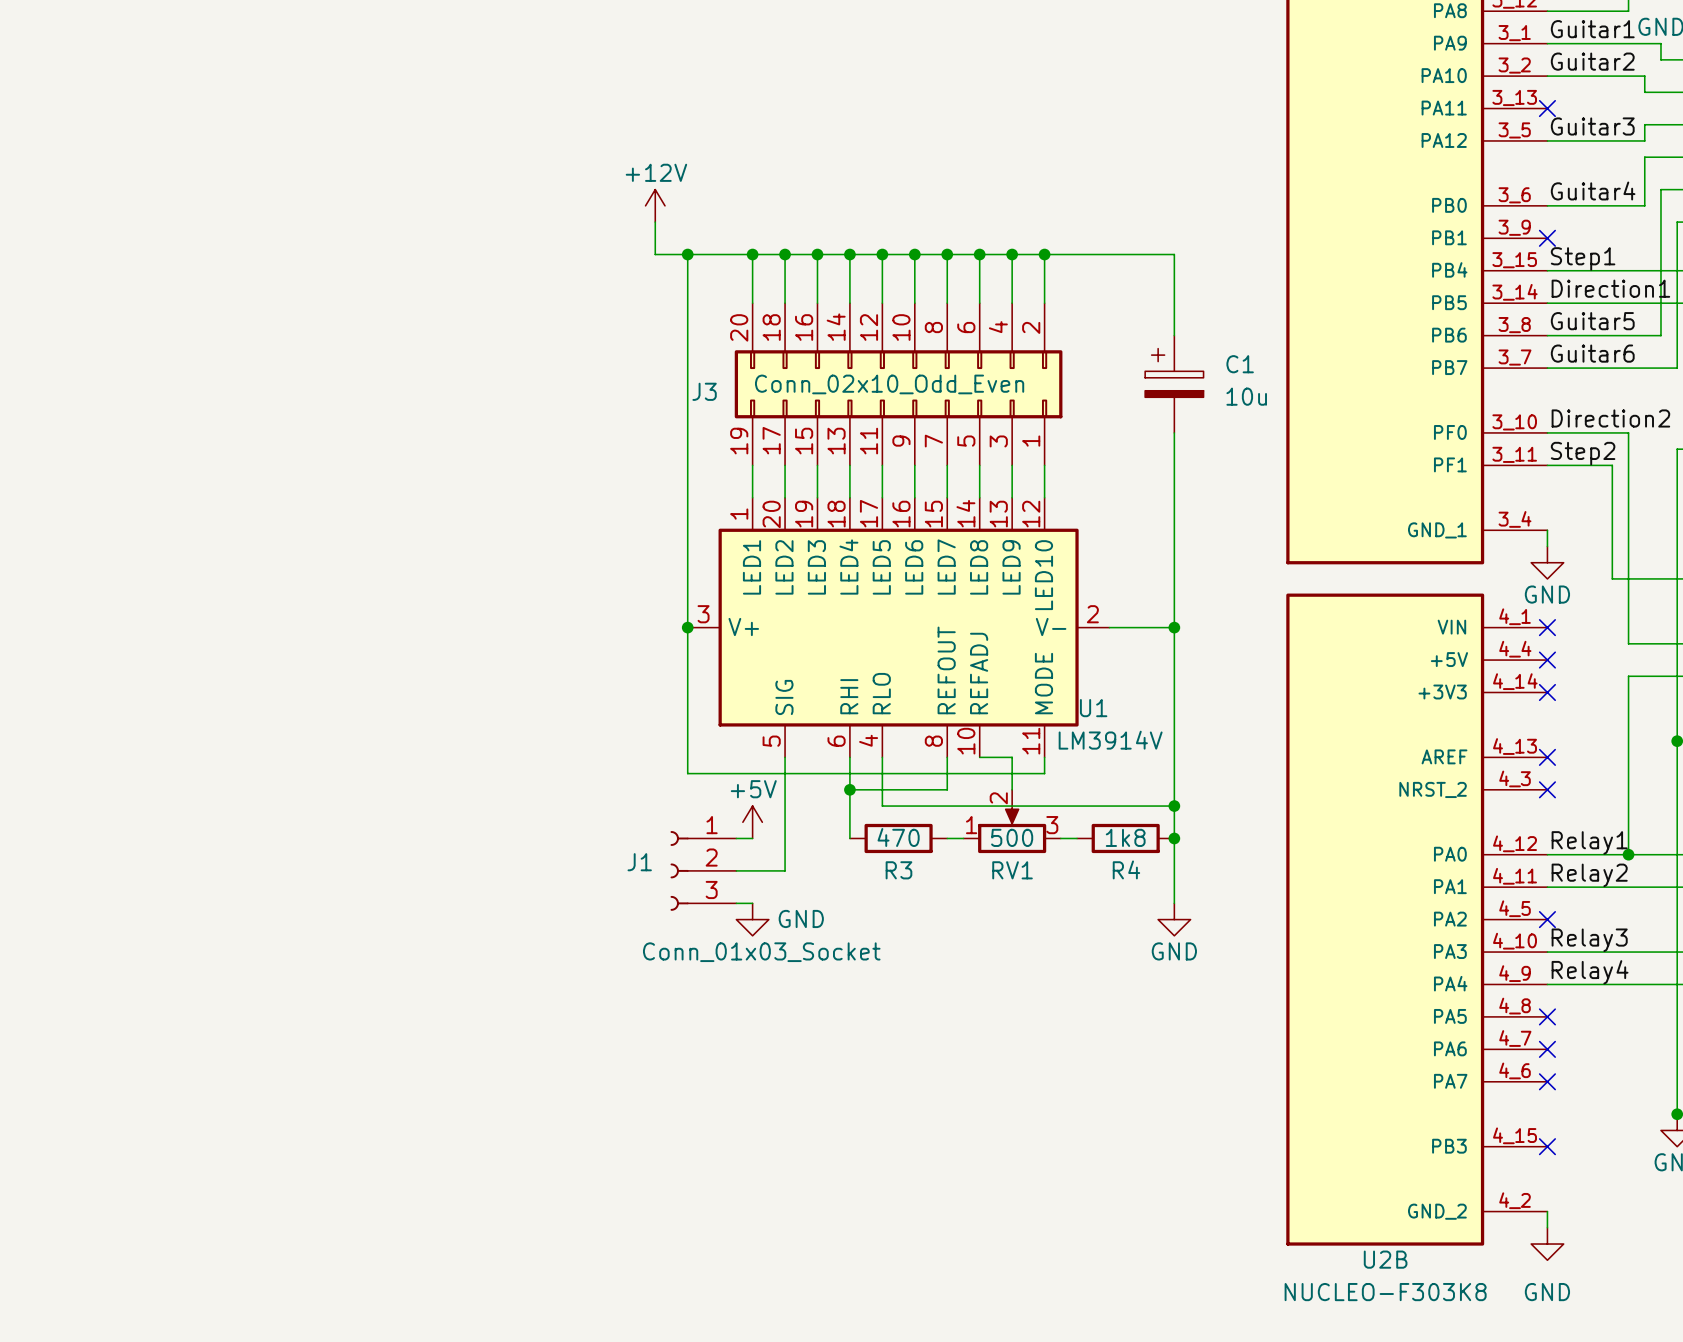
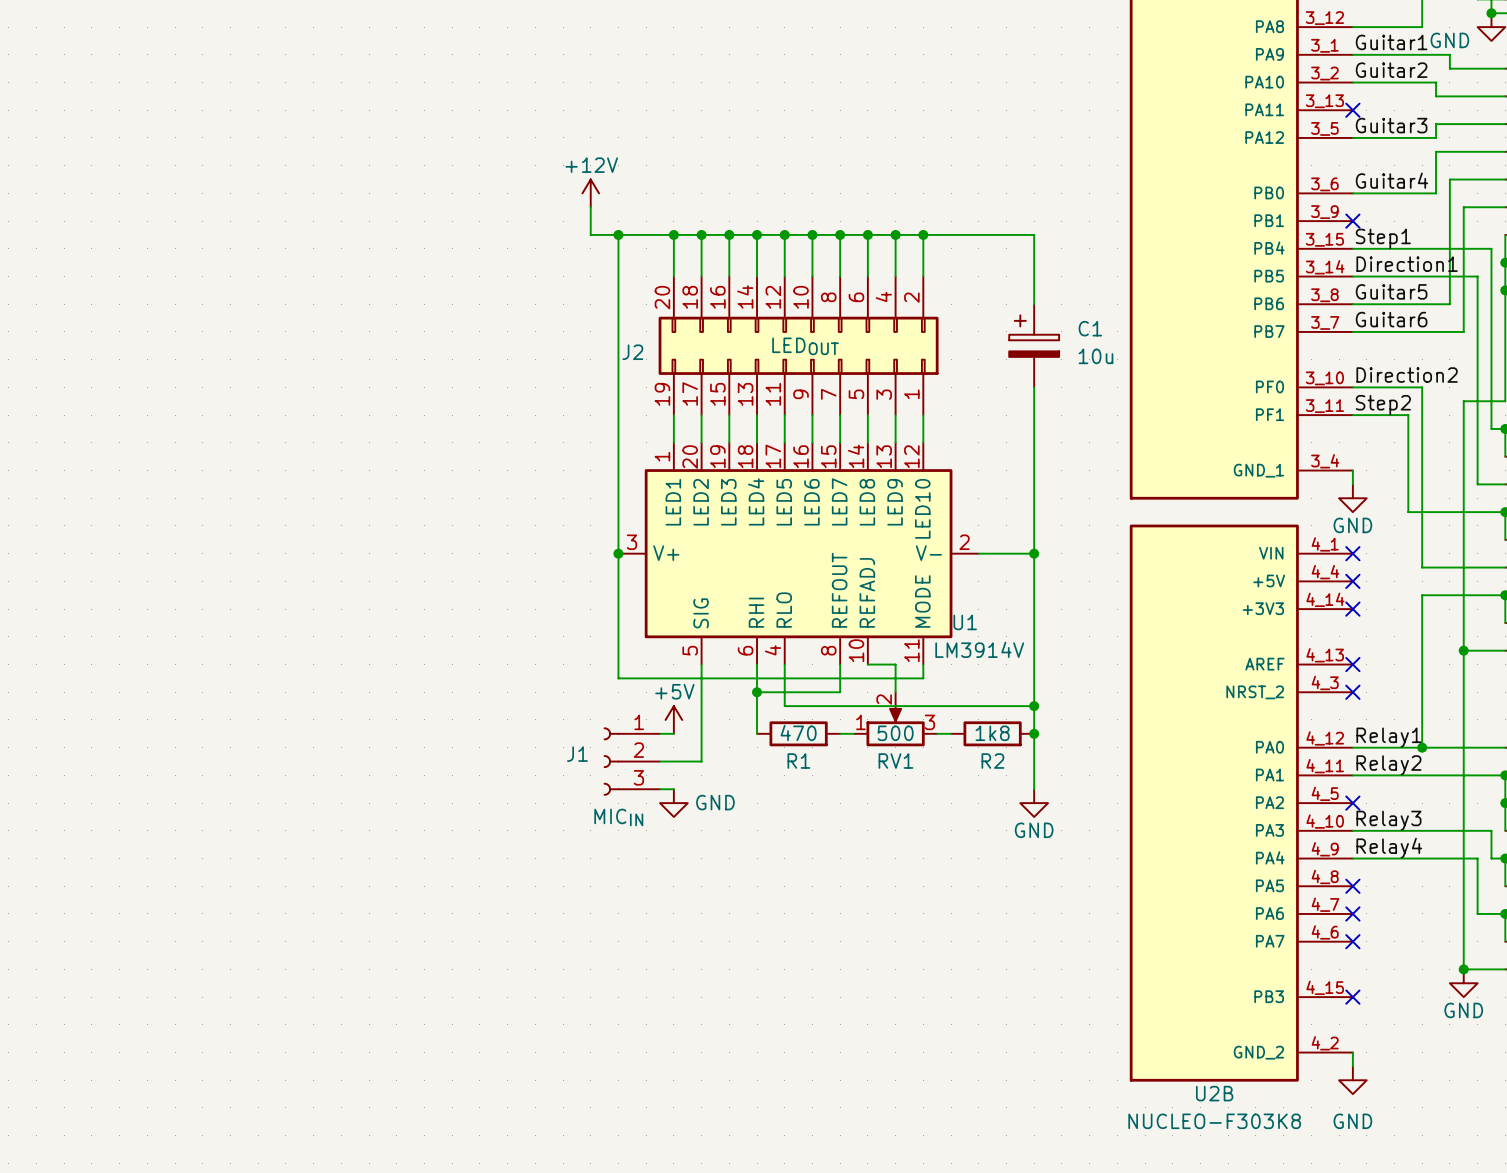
J3 value: Conn_02x10_Odd_Even (889, 384) -> LEDOUT (805, 346)
J3 name: J3 (704, 391) -> J2 (632, 352)
R4 name: R4 (1126, 869) -> R2 (992, 761)
R3 name: R3 (898, 870) -> R1 (798, 761)
J1 value: Conn_01x03_Socket (761, 952) -> MICIN (618, 817)

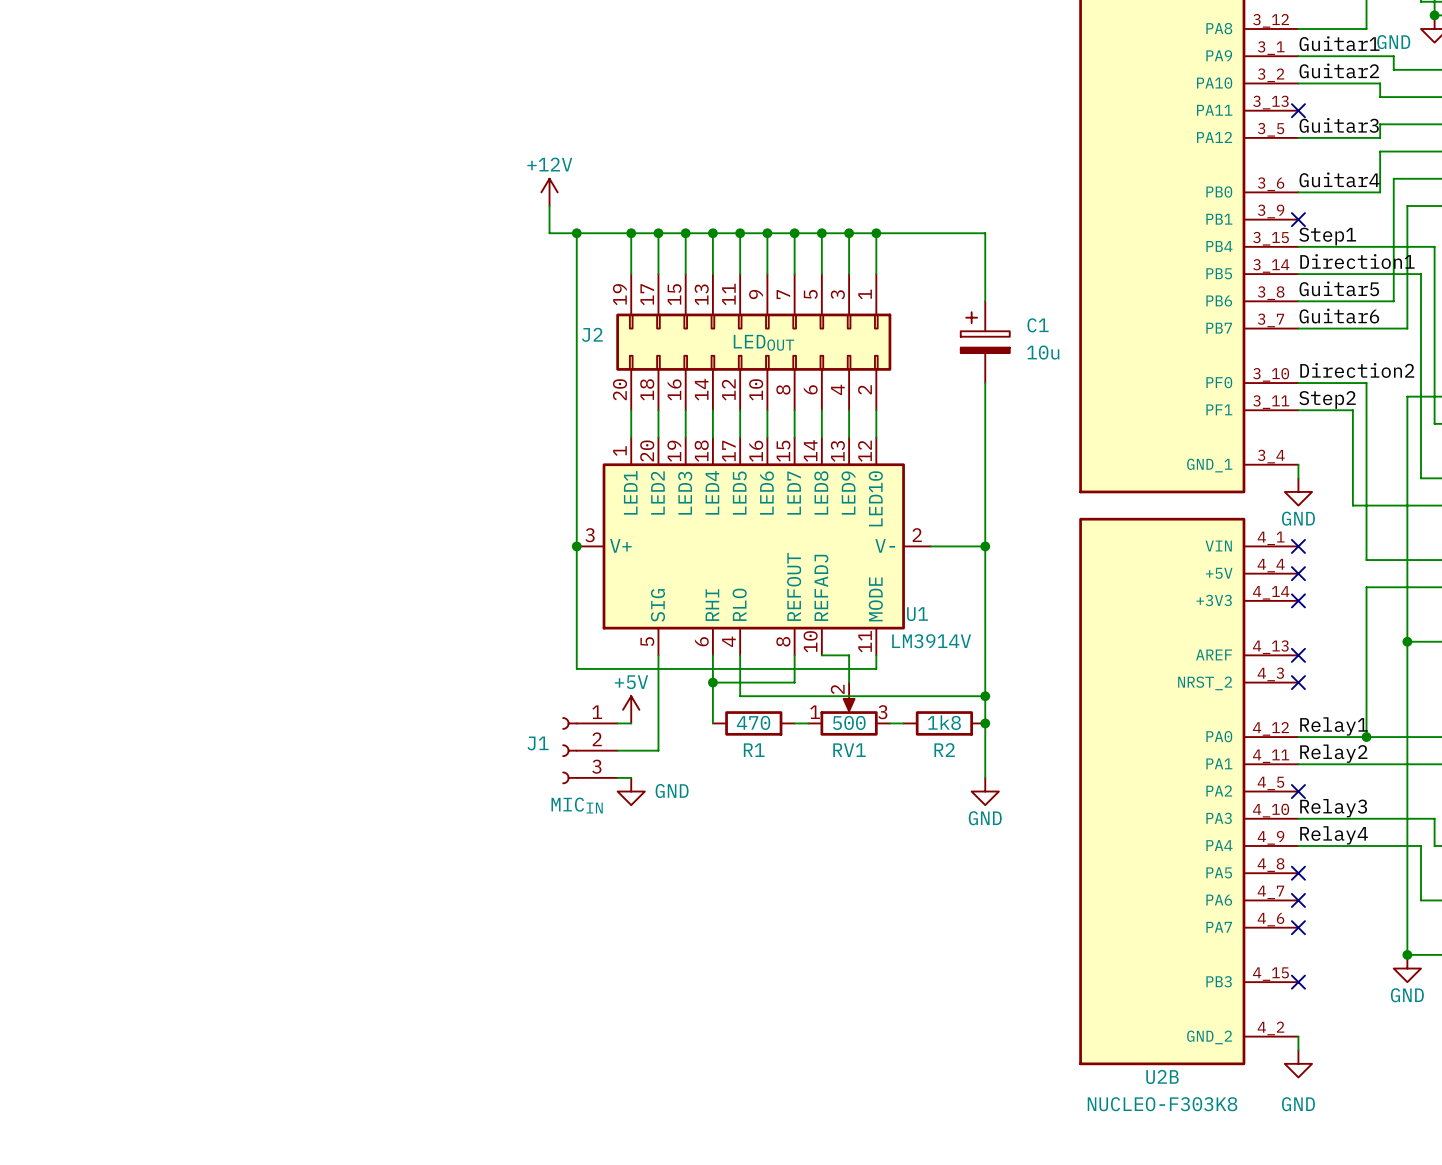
J2 flip: as is (798, 345) -> up-down (753, 342)

